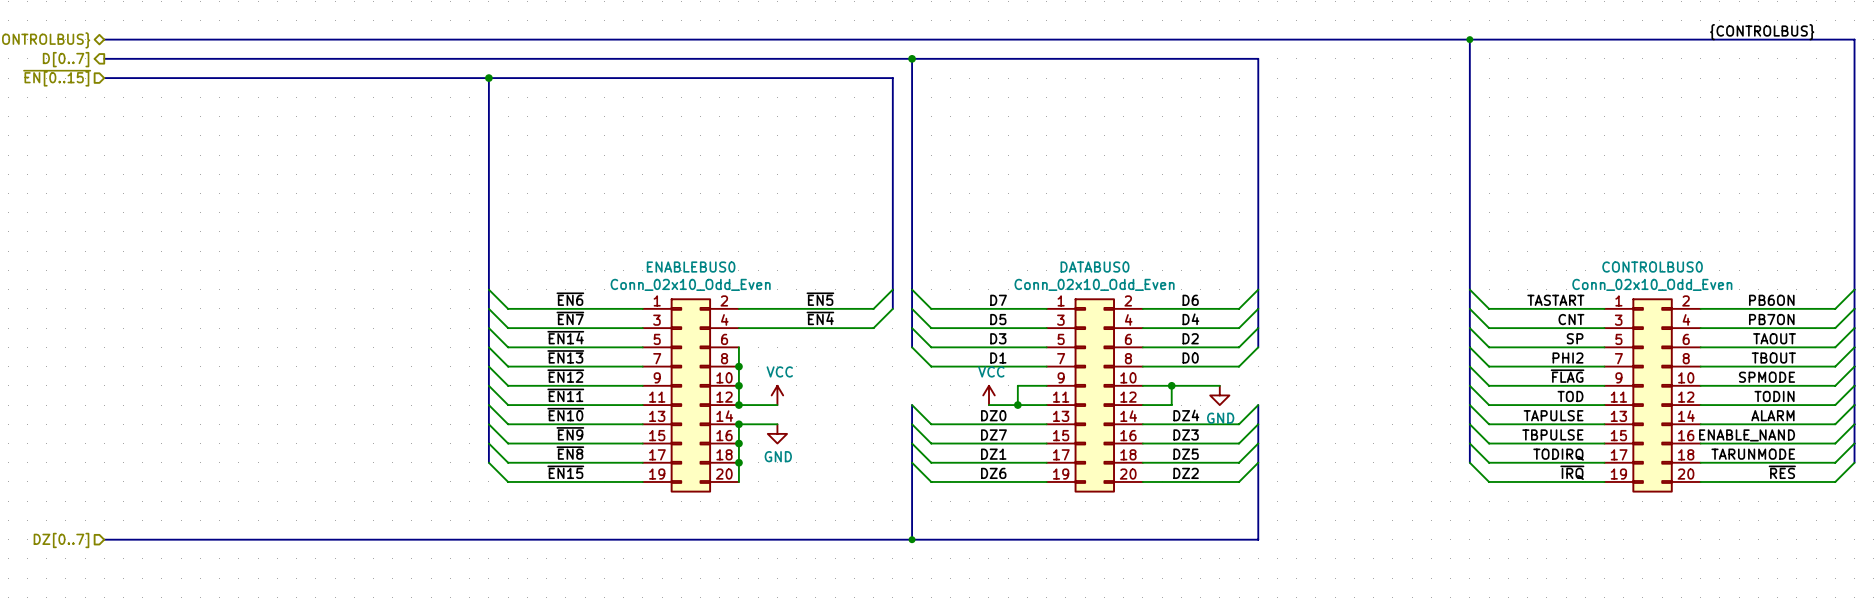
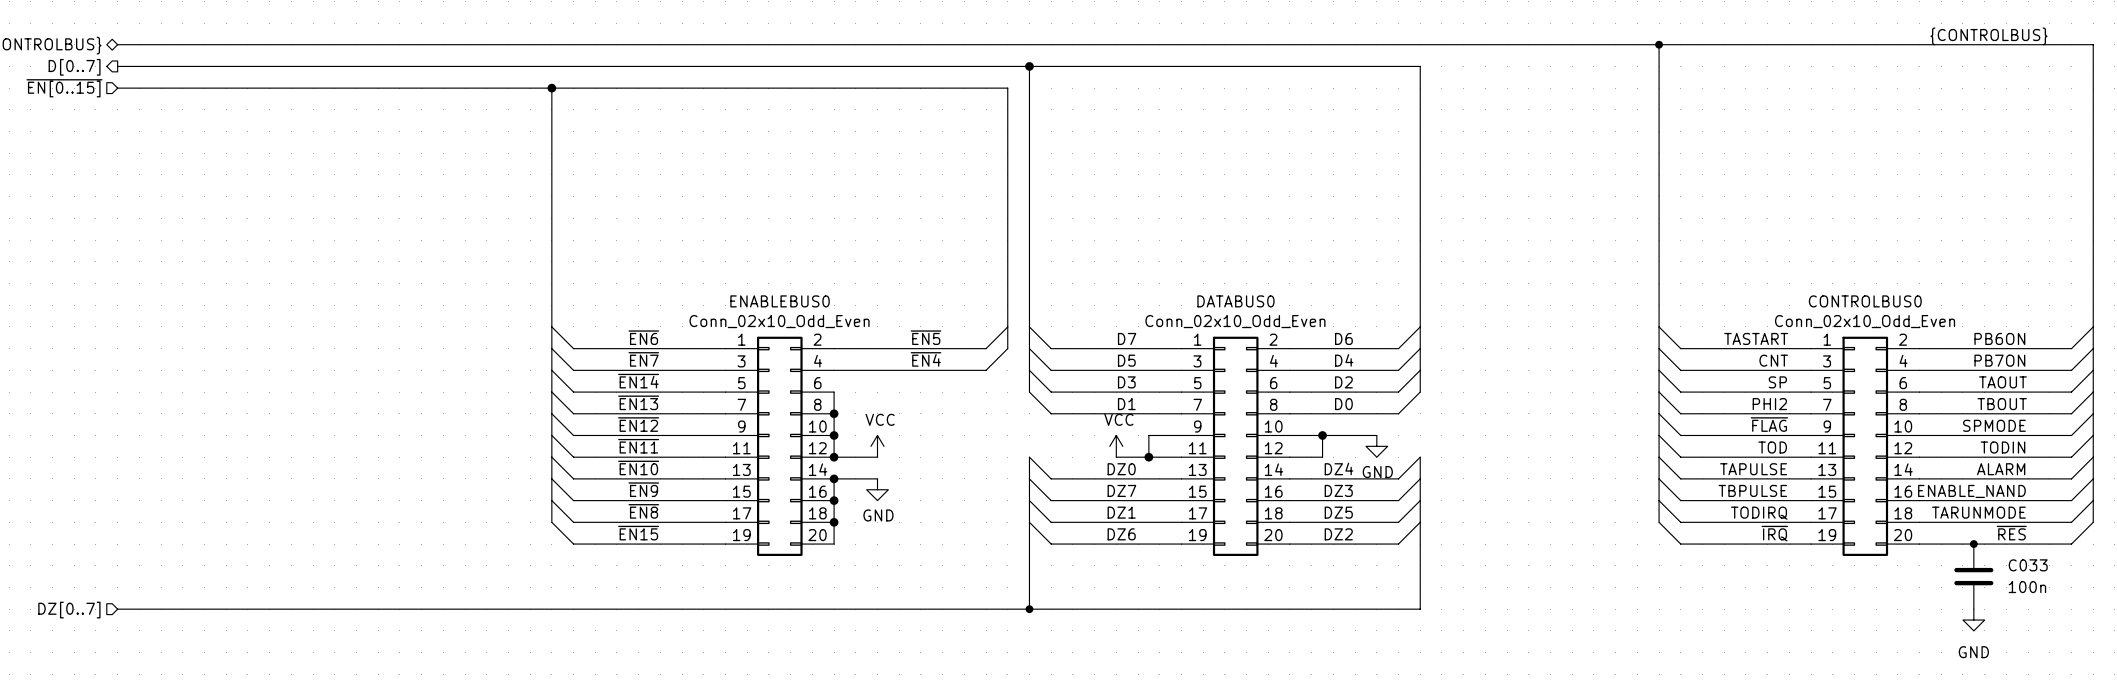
junction: none -> (1973, 544)
C033: none -> 100n (1973, 576)
power symbol: none -> GND (1973, 620)

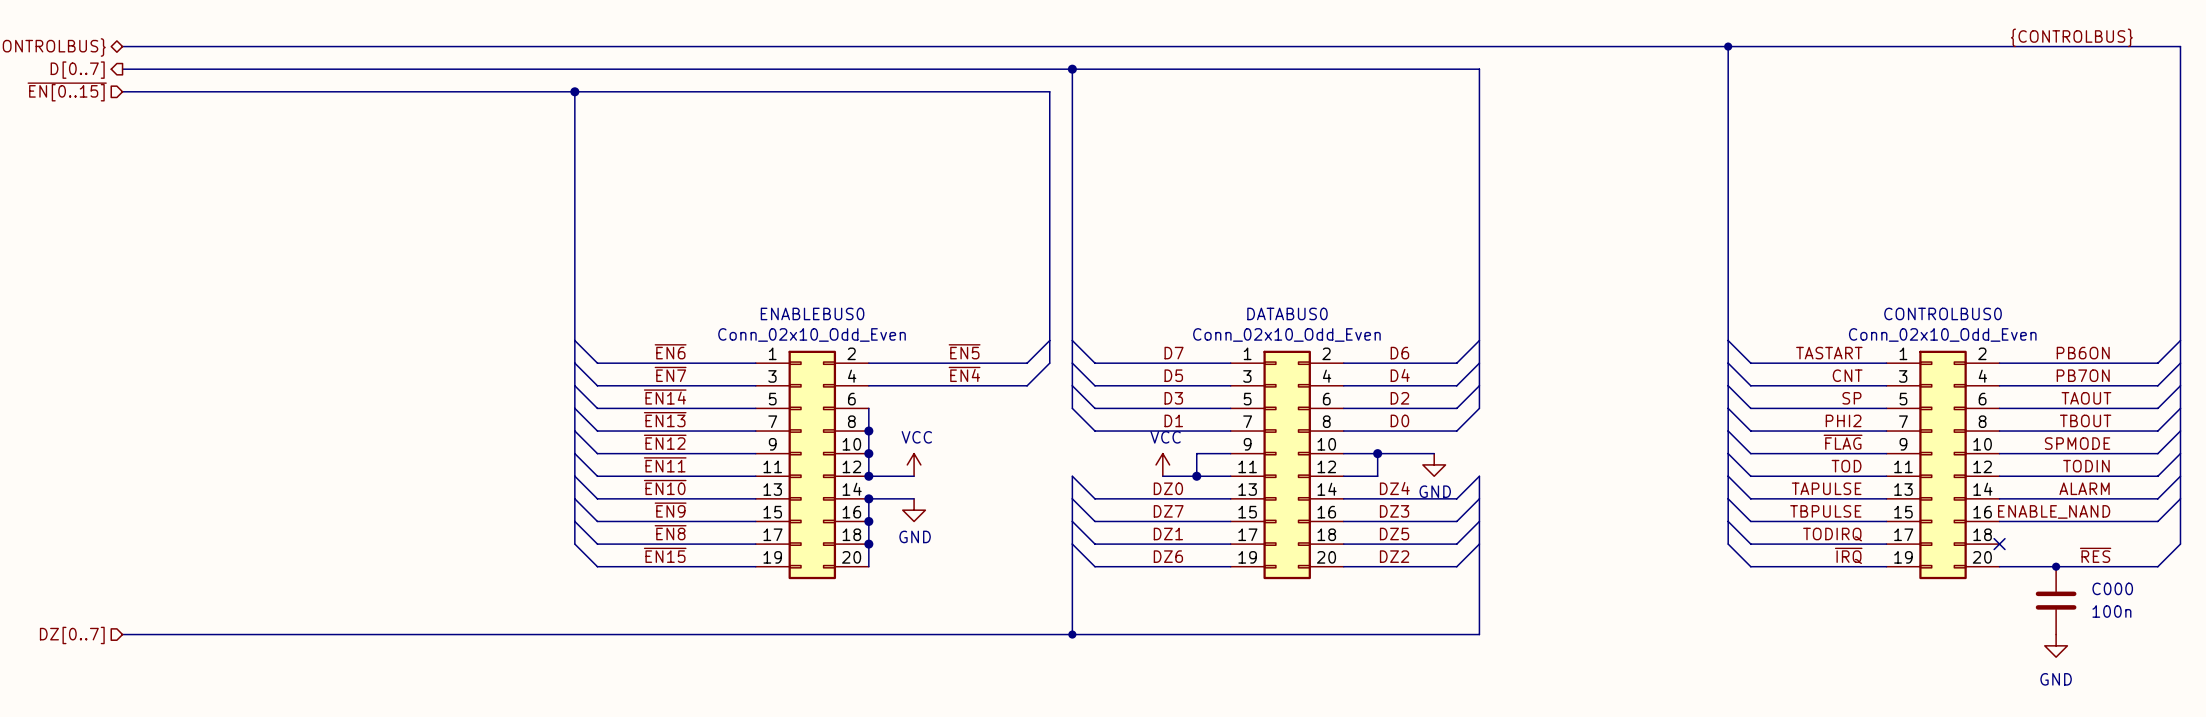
wire: (2093, 500) (2071, 522) (1919, 522) -> none
label: TARUNMODE (1978, 512) -> none
no-connect mark: none -> (1999, 544)
C033 name: C033 (2028, 565) -> C000 (2112, 588)

